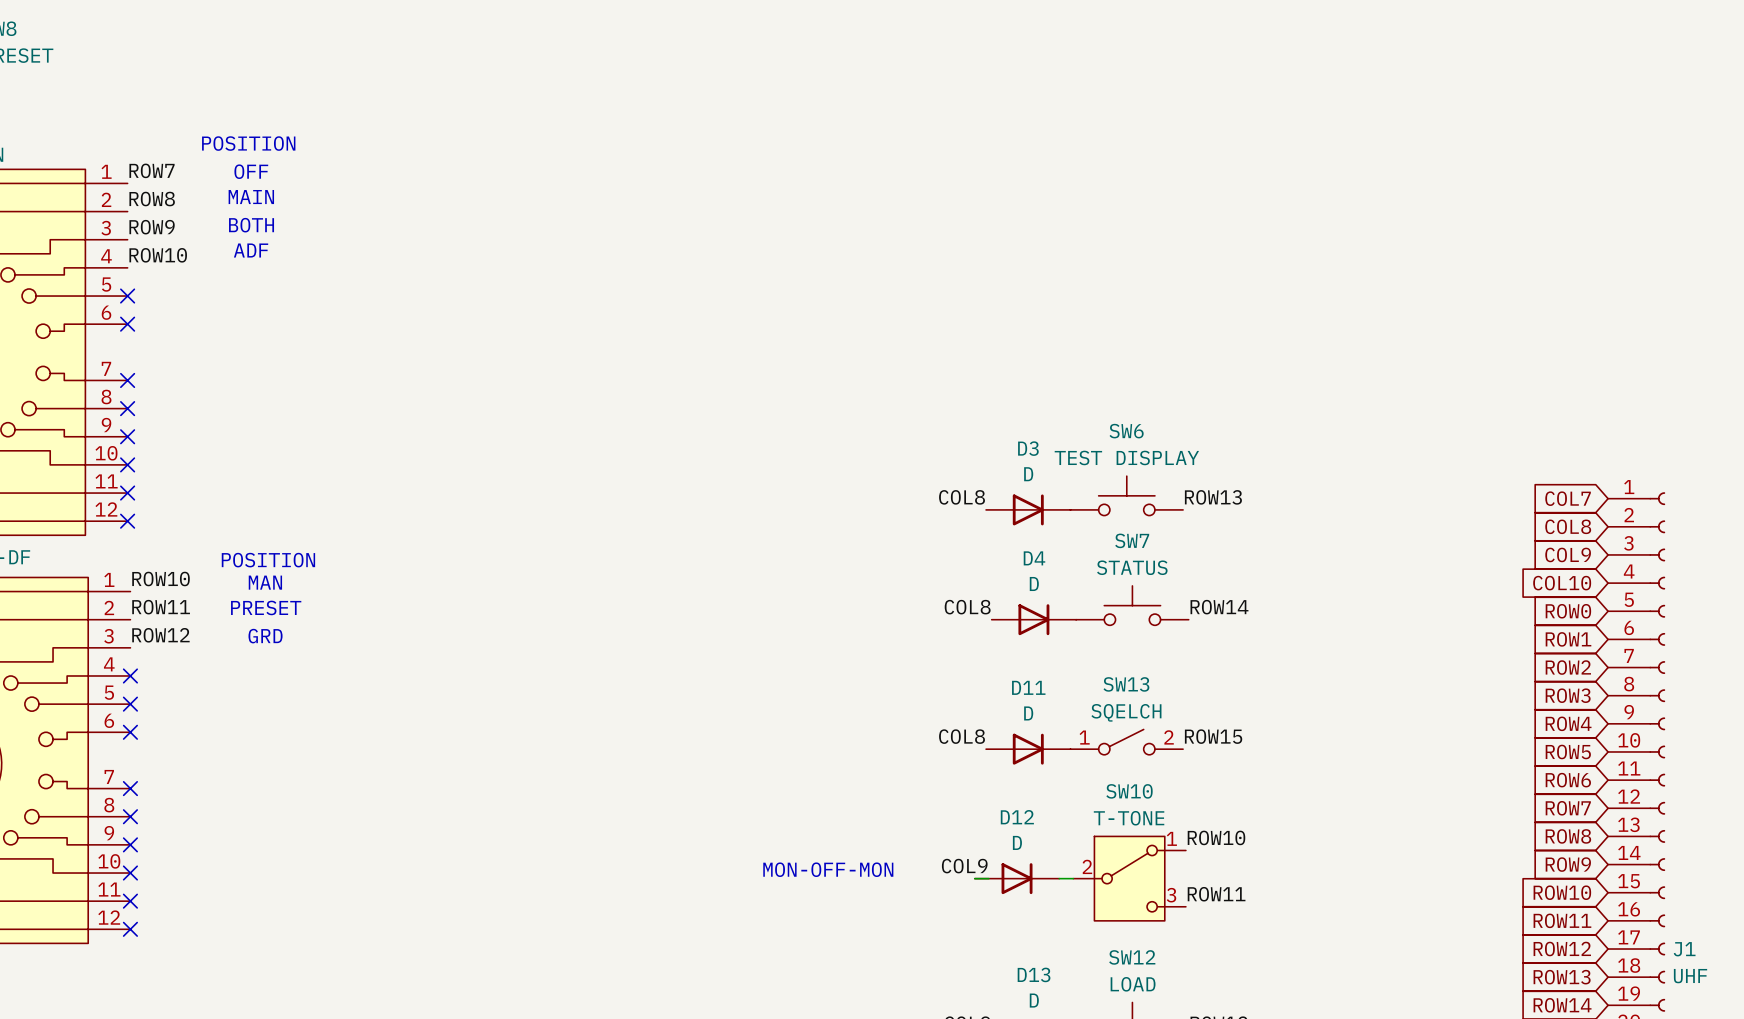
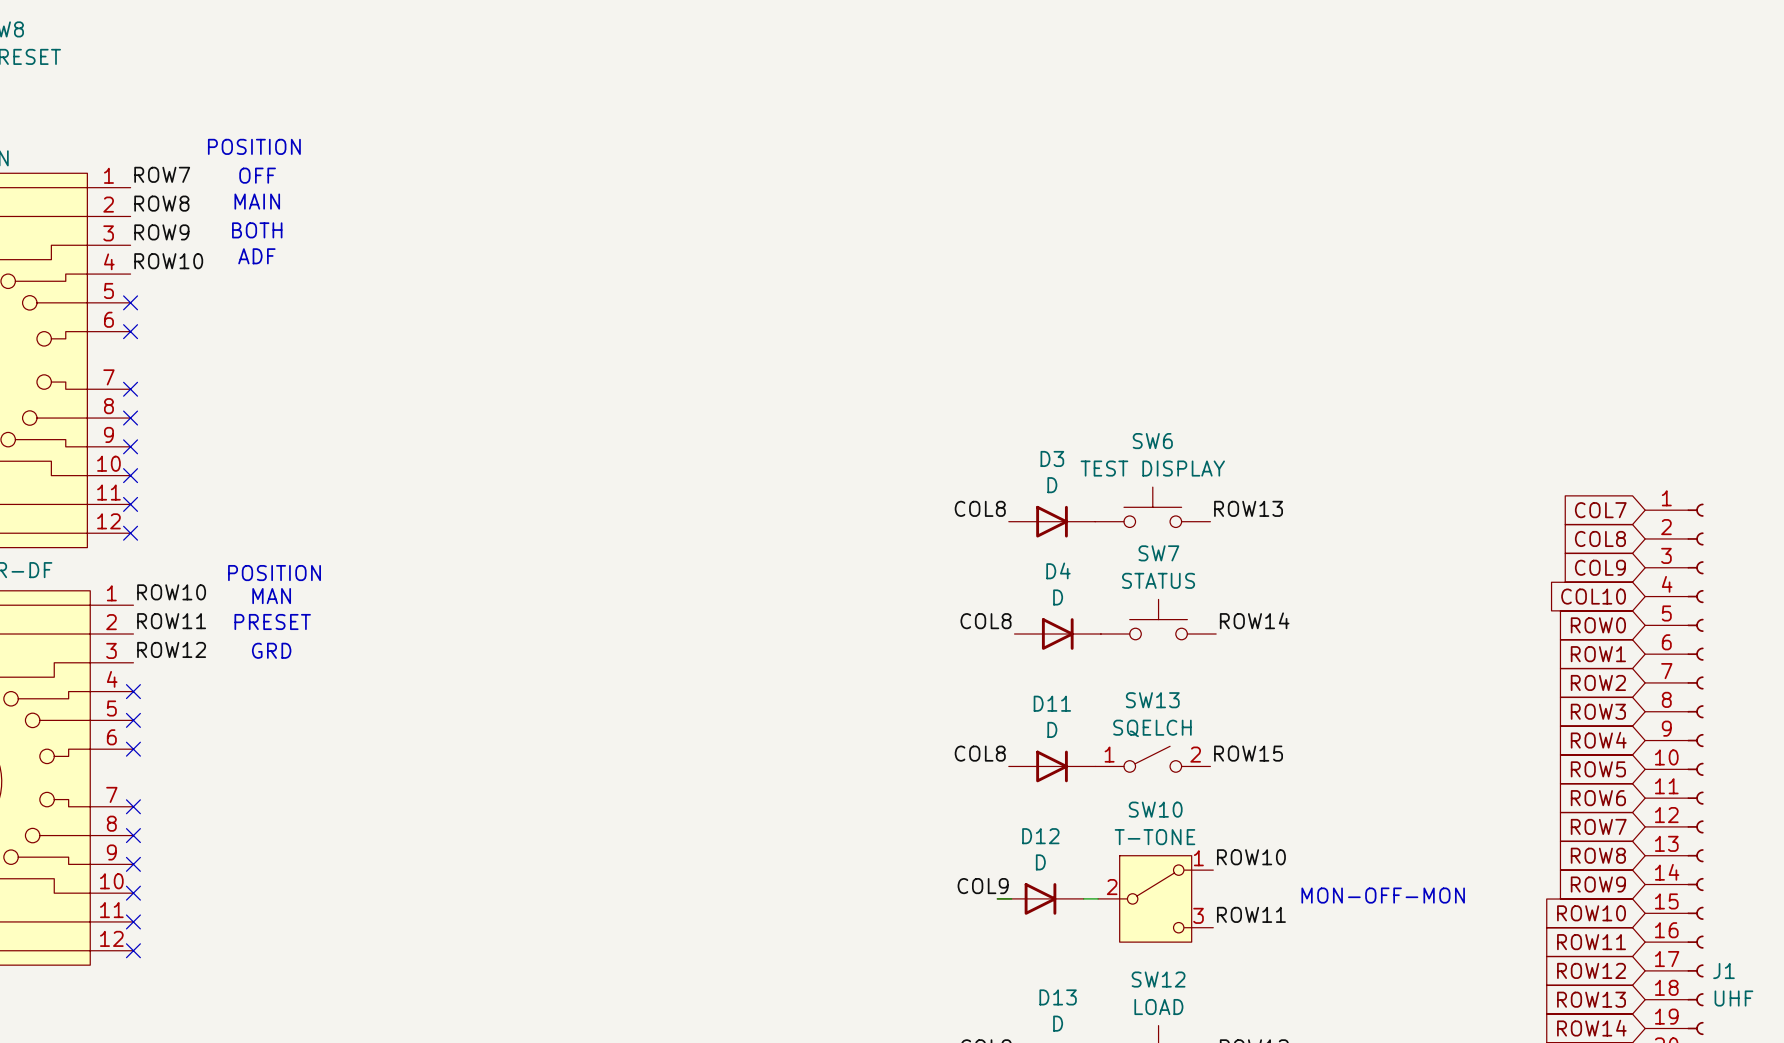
text: MON-OFF-MON (828, 869) -> none
text: none -> MON-OFF-MON (1383, 895)

